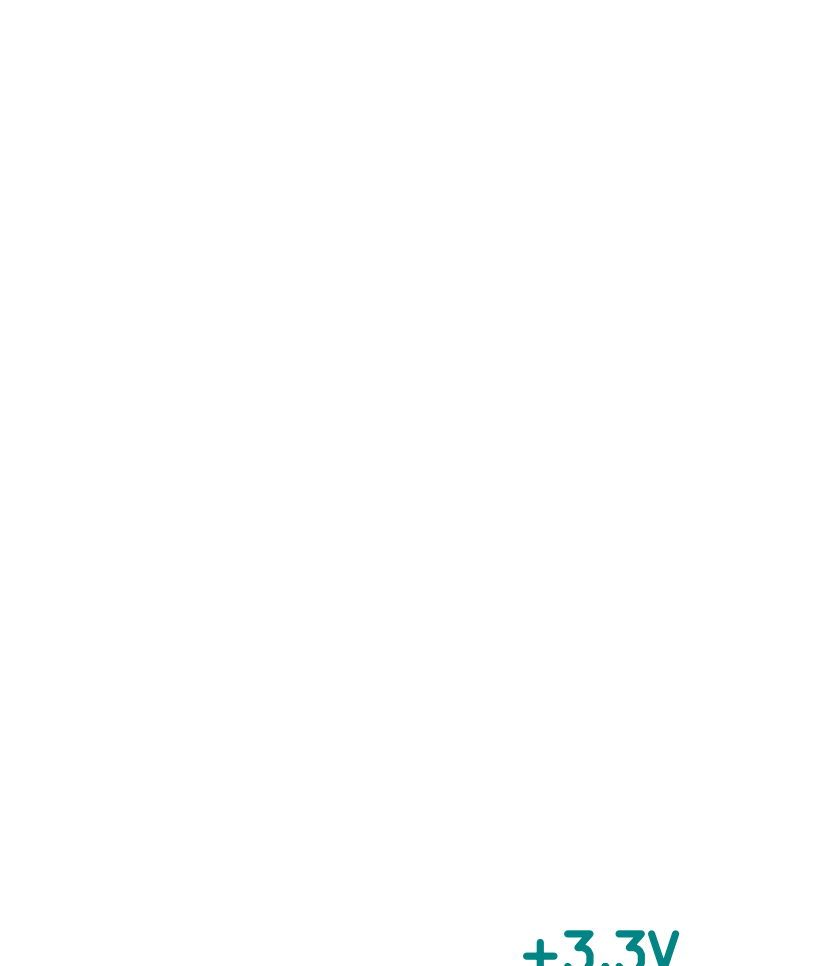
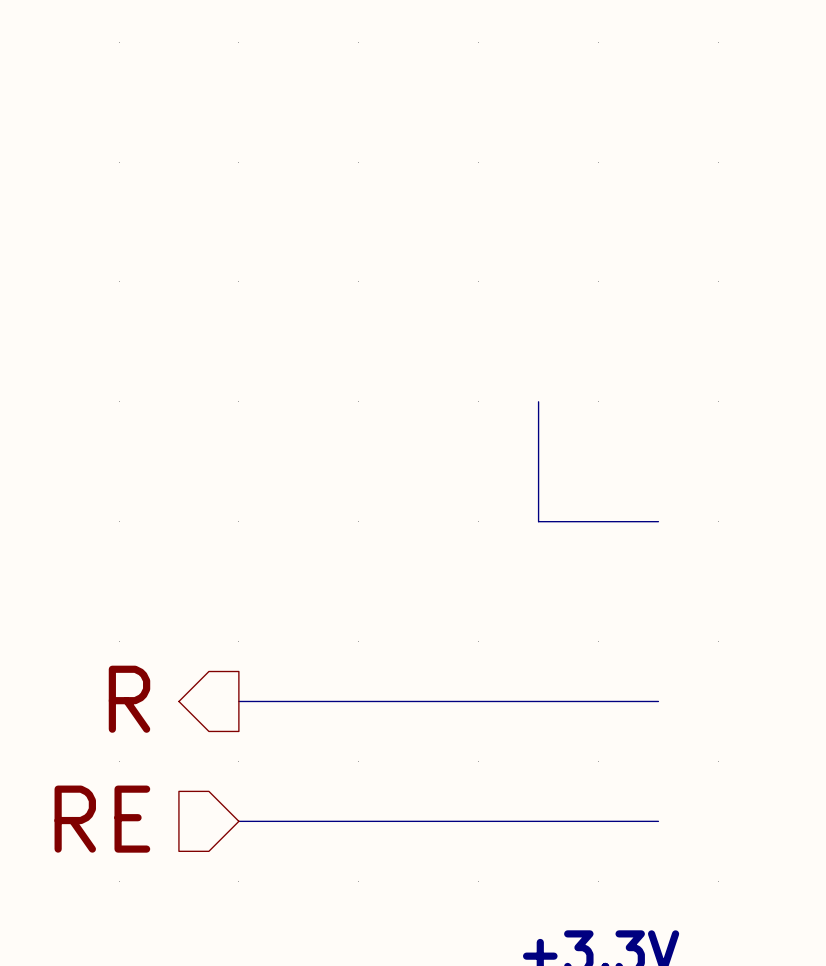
wire: none -> (538, 401) (538, 521) (658, 521)
hierarchical label: none -> R (129, 699)
wire: none -> (238, 701) (658, 701)
hierarchical label: none -> RE (102, 819)
wire: none -> (238, 821) (658, 821)

